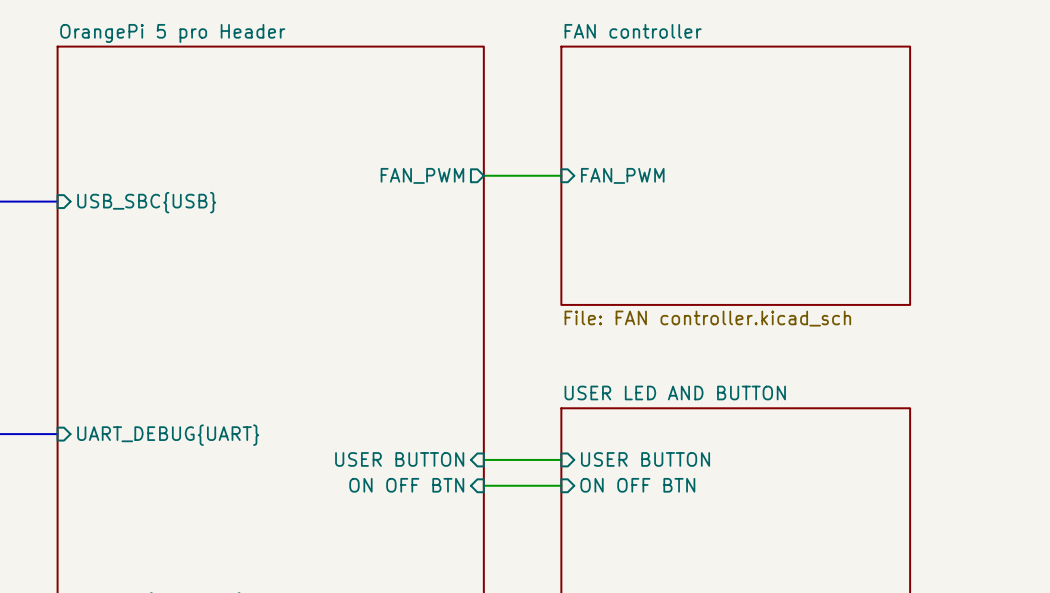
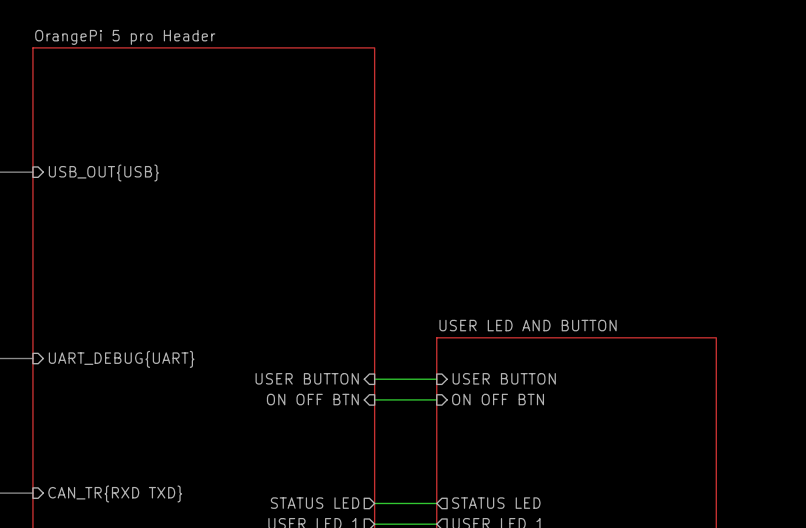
sheet pin: FAN_PWM (422, 175) -> none
wire: (483, 175) (561, 175) -> none
sheet pin: FAN_PWM (622, 175) -> none
sheet FAN controller: File: FAN controller.kicad_sch (735, 175) -> none
sheet pin: USB_SBC{USB} (146, 202) -> USB_OUT{USB} (103, 172)

